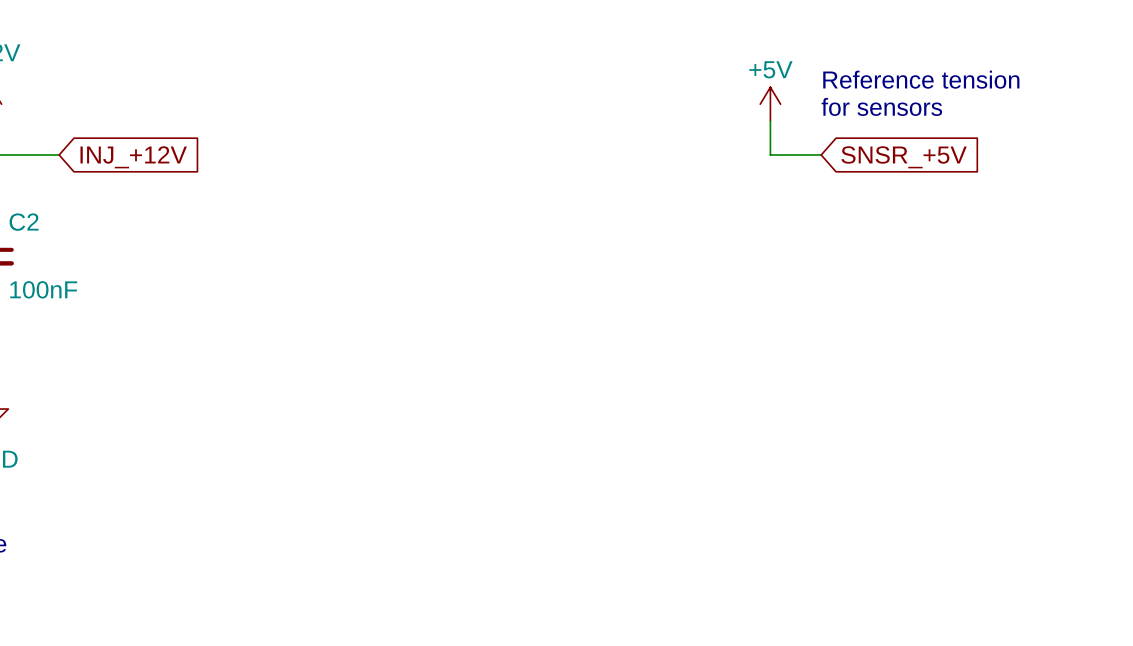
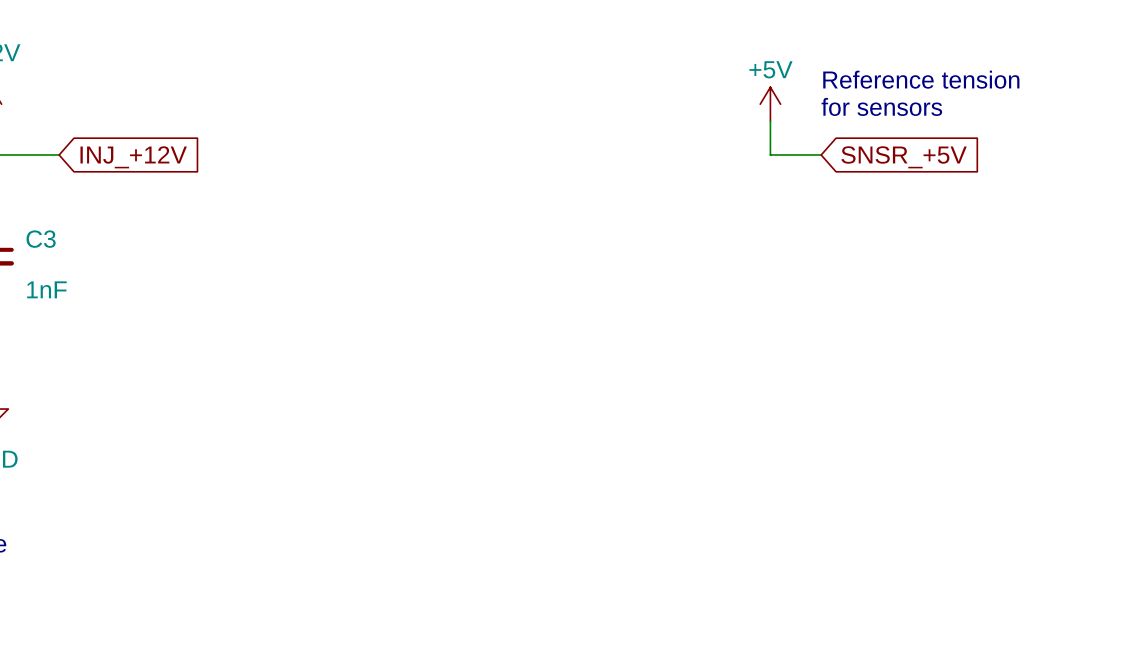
C2 name: C2 (24, 222) -> C3 (41, 239)
C2 value: 100nF (43, 289) -> 1nF (46, 289)

